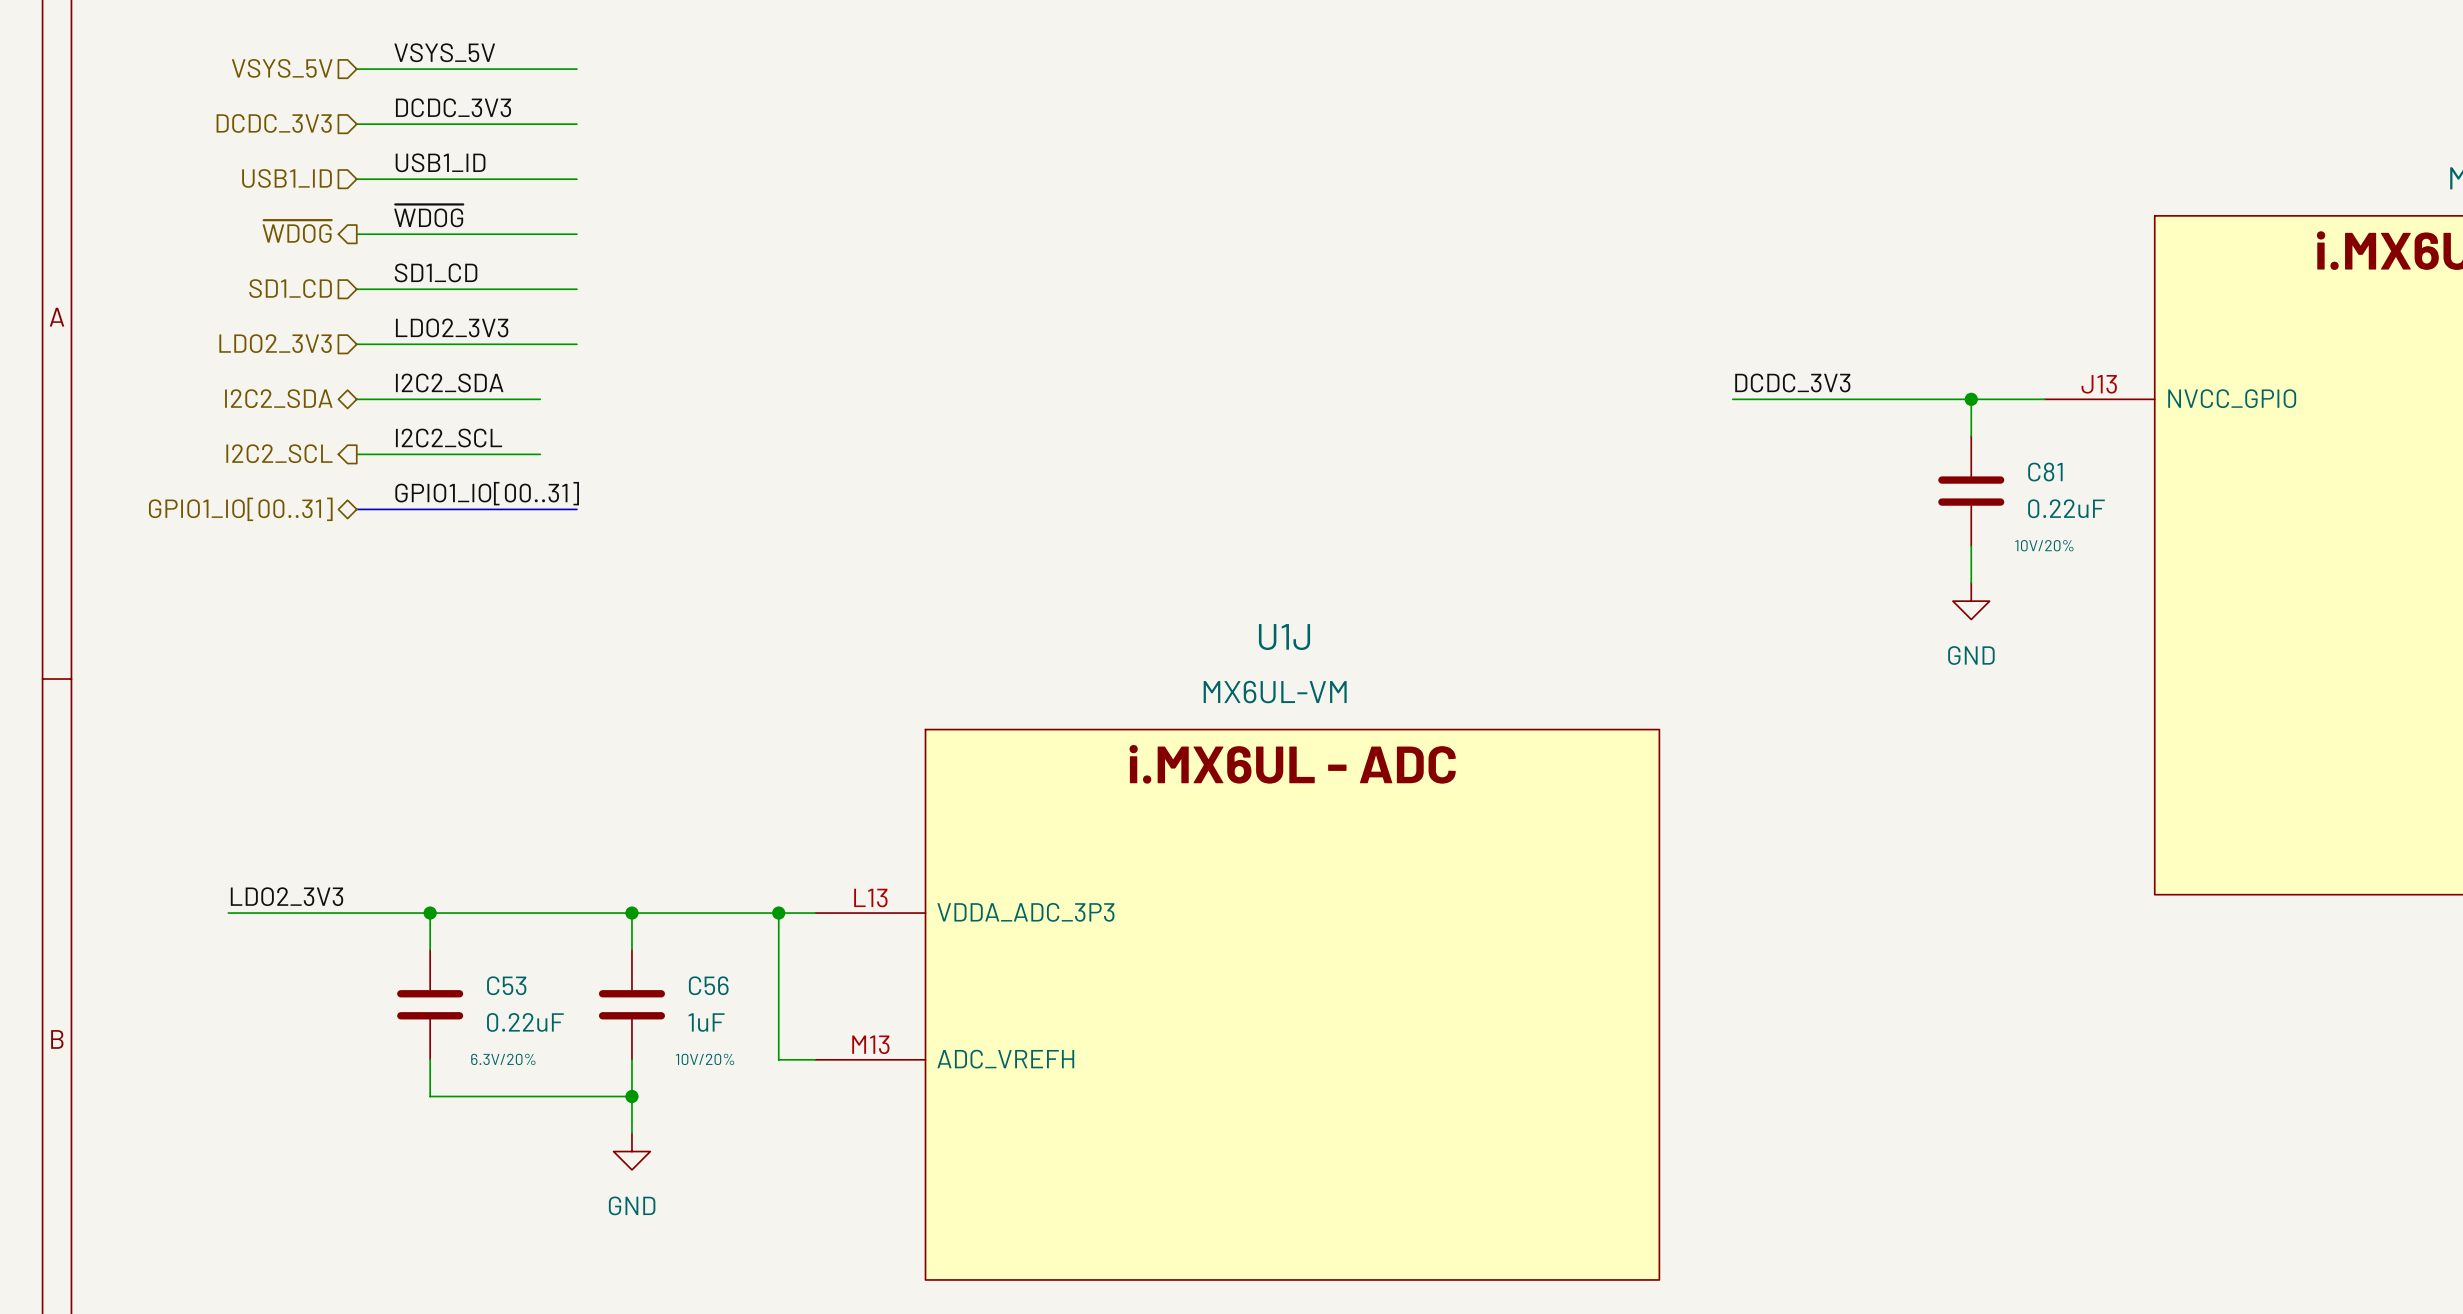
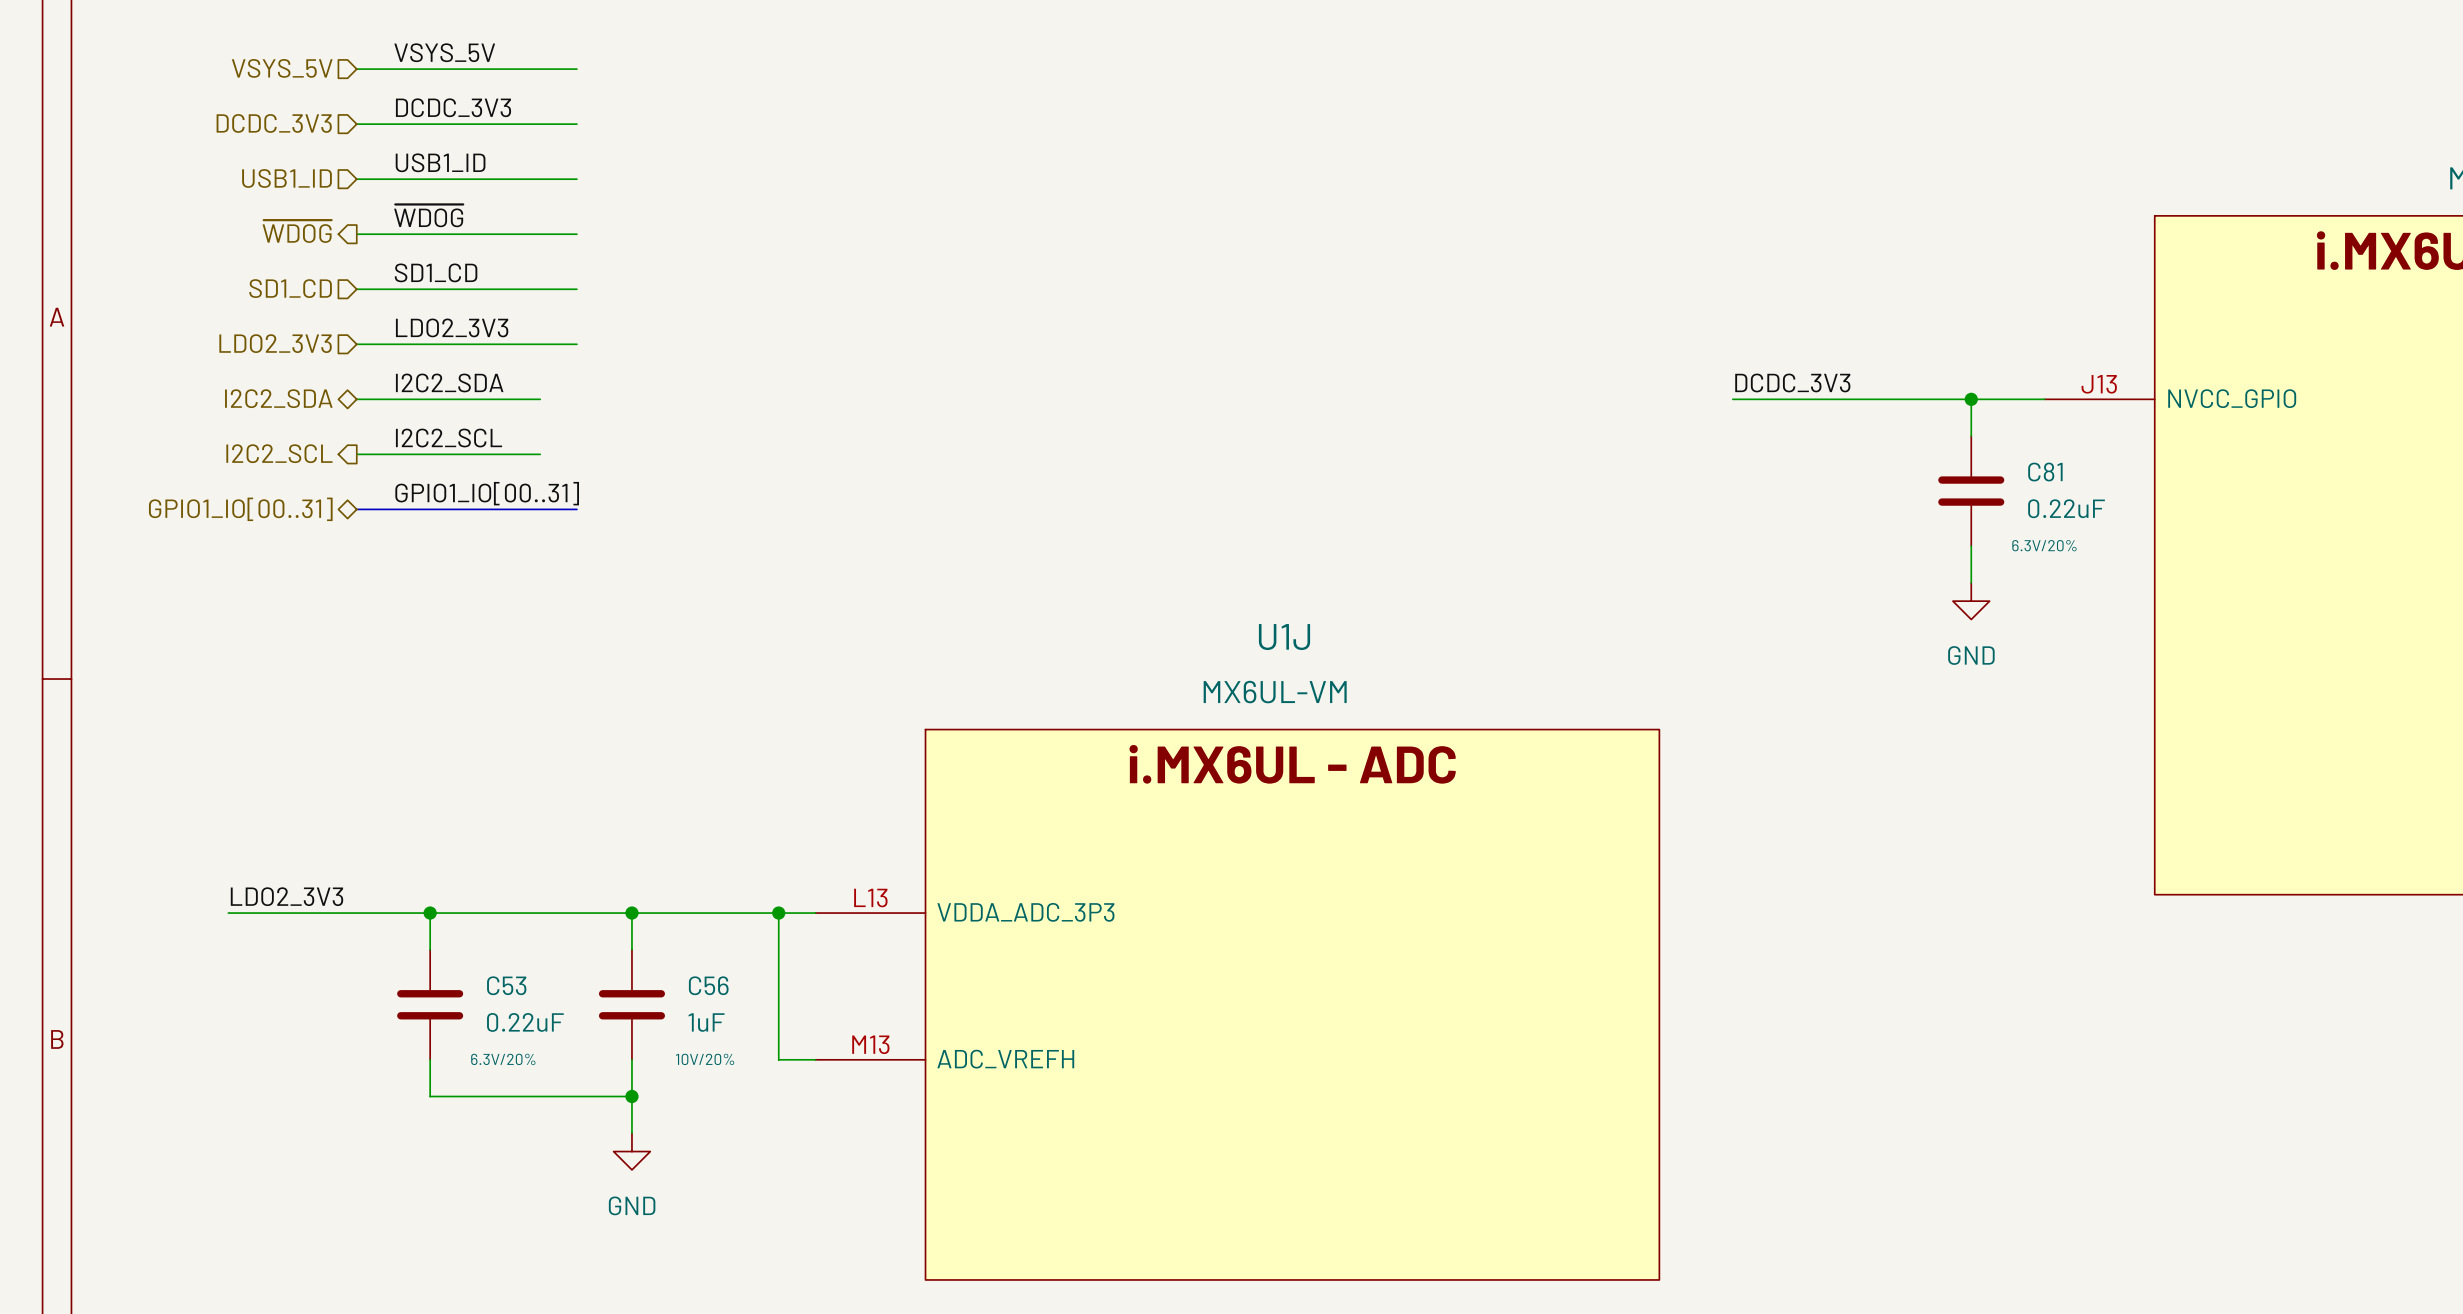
C81 text: 10V/20% (2044, 545) -> 6.3V/20% (2044, 545)

